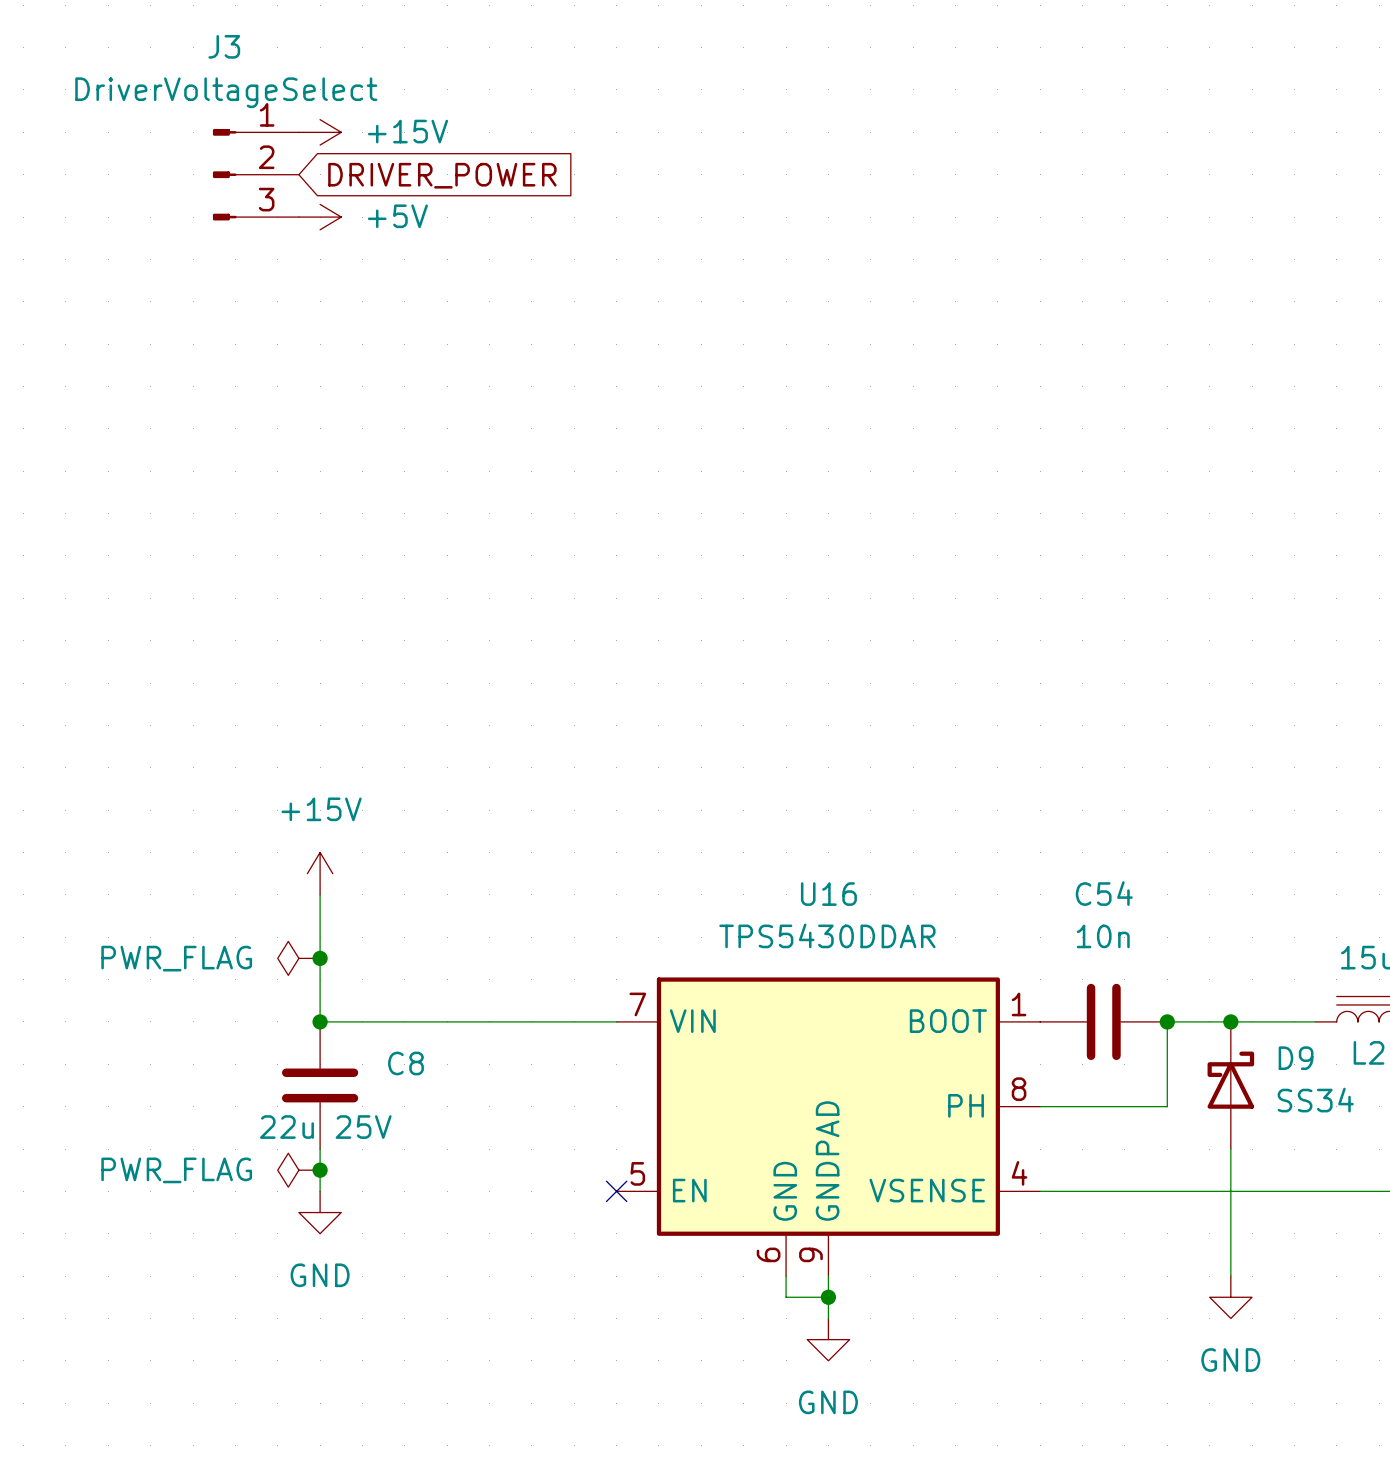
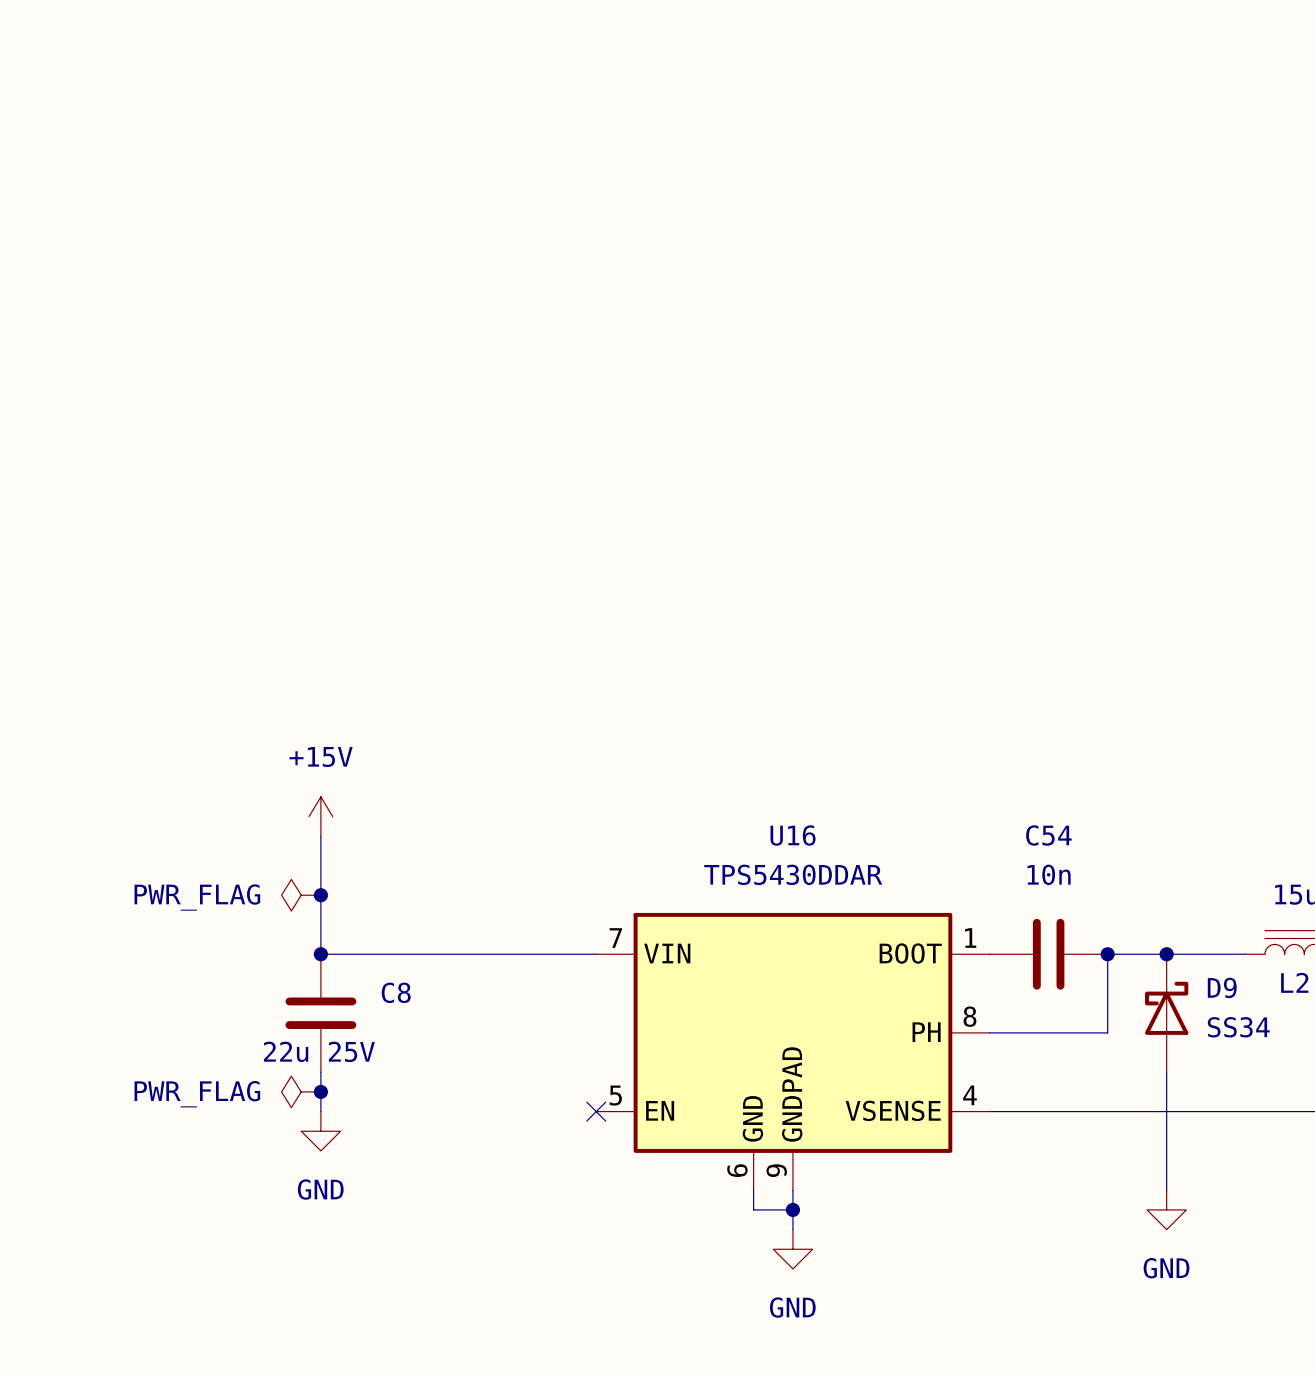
power symbol: +15V (320, 132) -> none
J3: DriverVoltageSelect (255, 174) -> none
global label: DRIVER_POWER (442, 175) -> none
power symbol: +5V (320, 217) -> none

